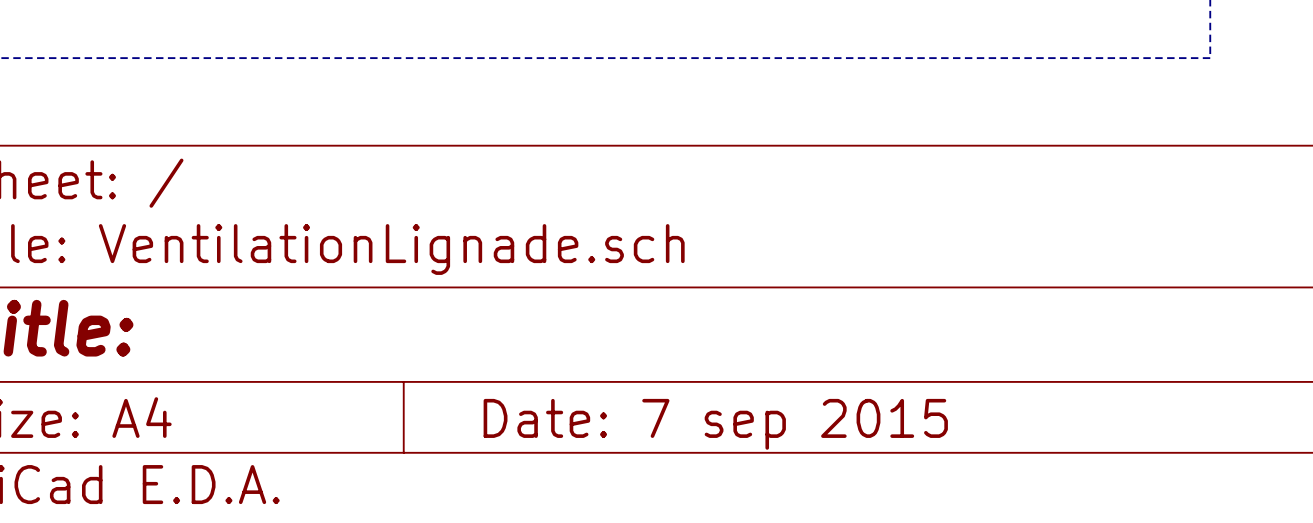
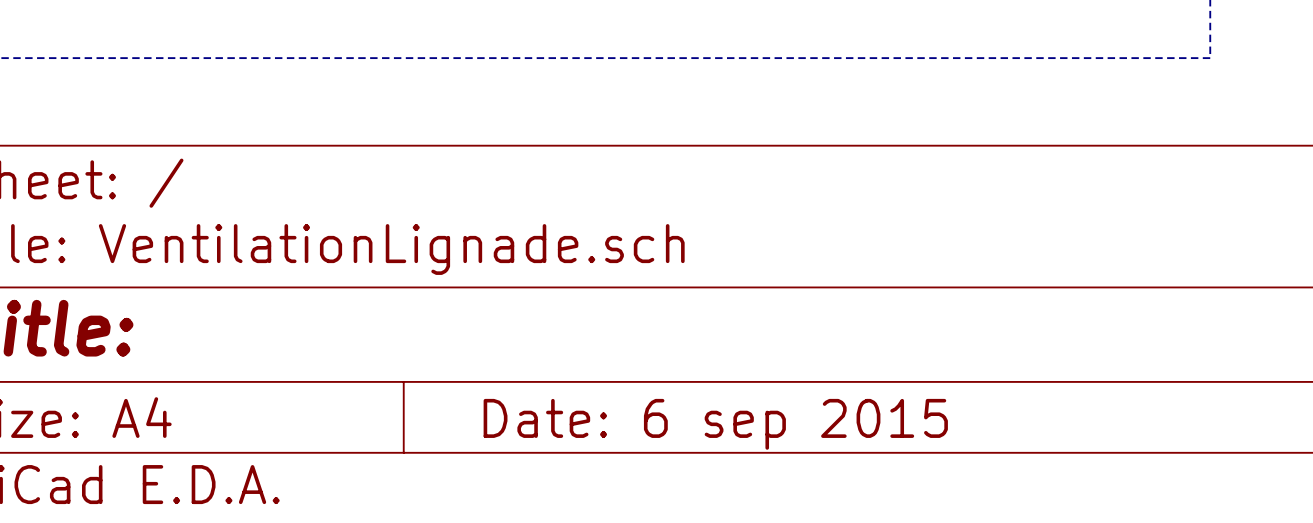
title block: Date: 7 sep 2015 (715, 424) -> Date: 6 sep 2015 (715, 424)

